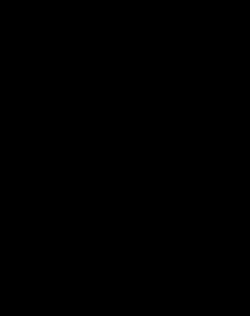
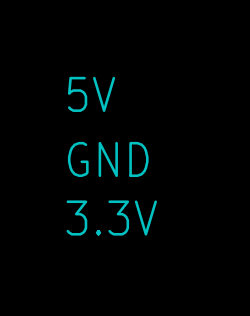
text: none -> 5V (91, 94)
text: none -> GND (108, 159)
text: none -> 3.3V (111, 218)

